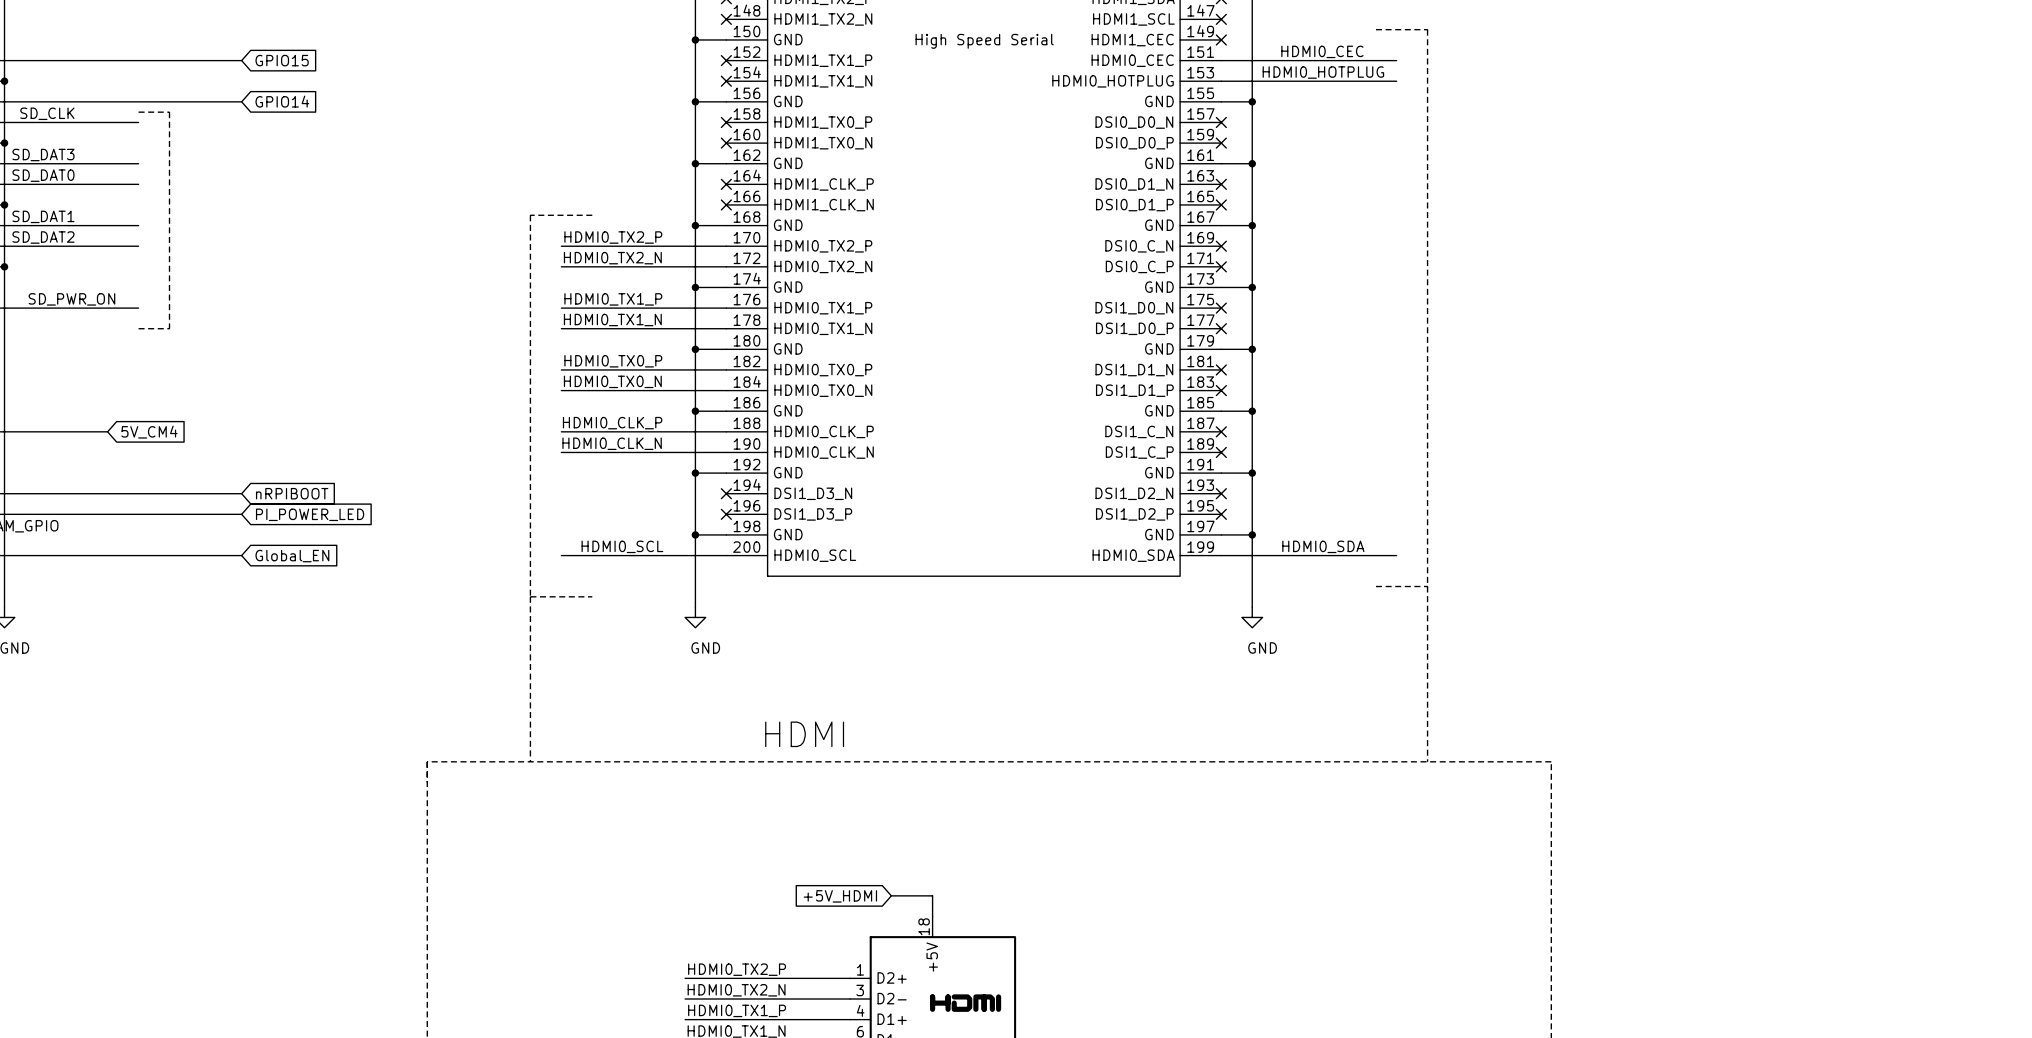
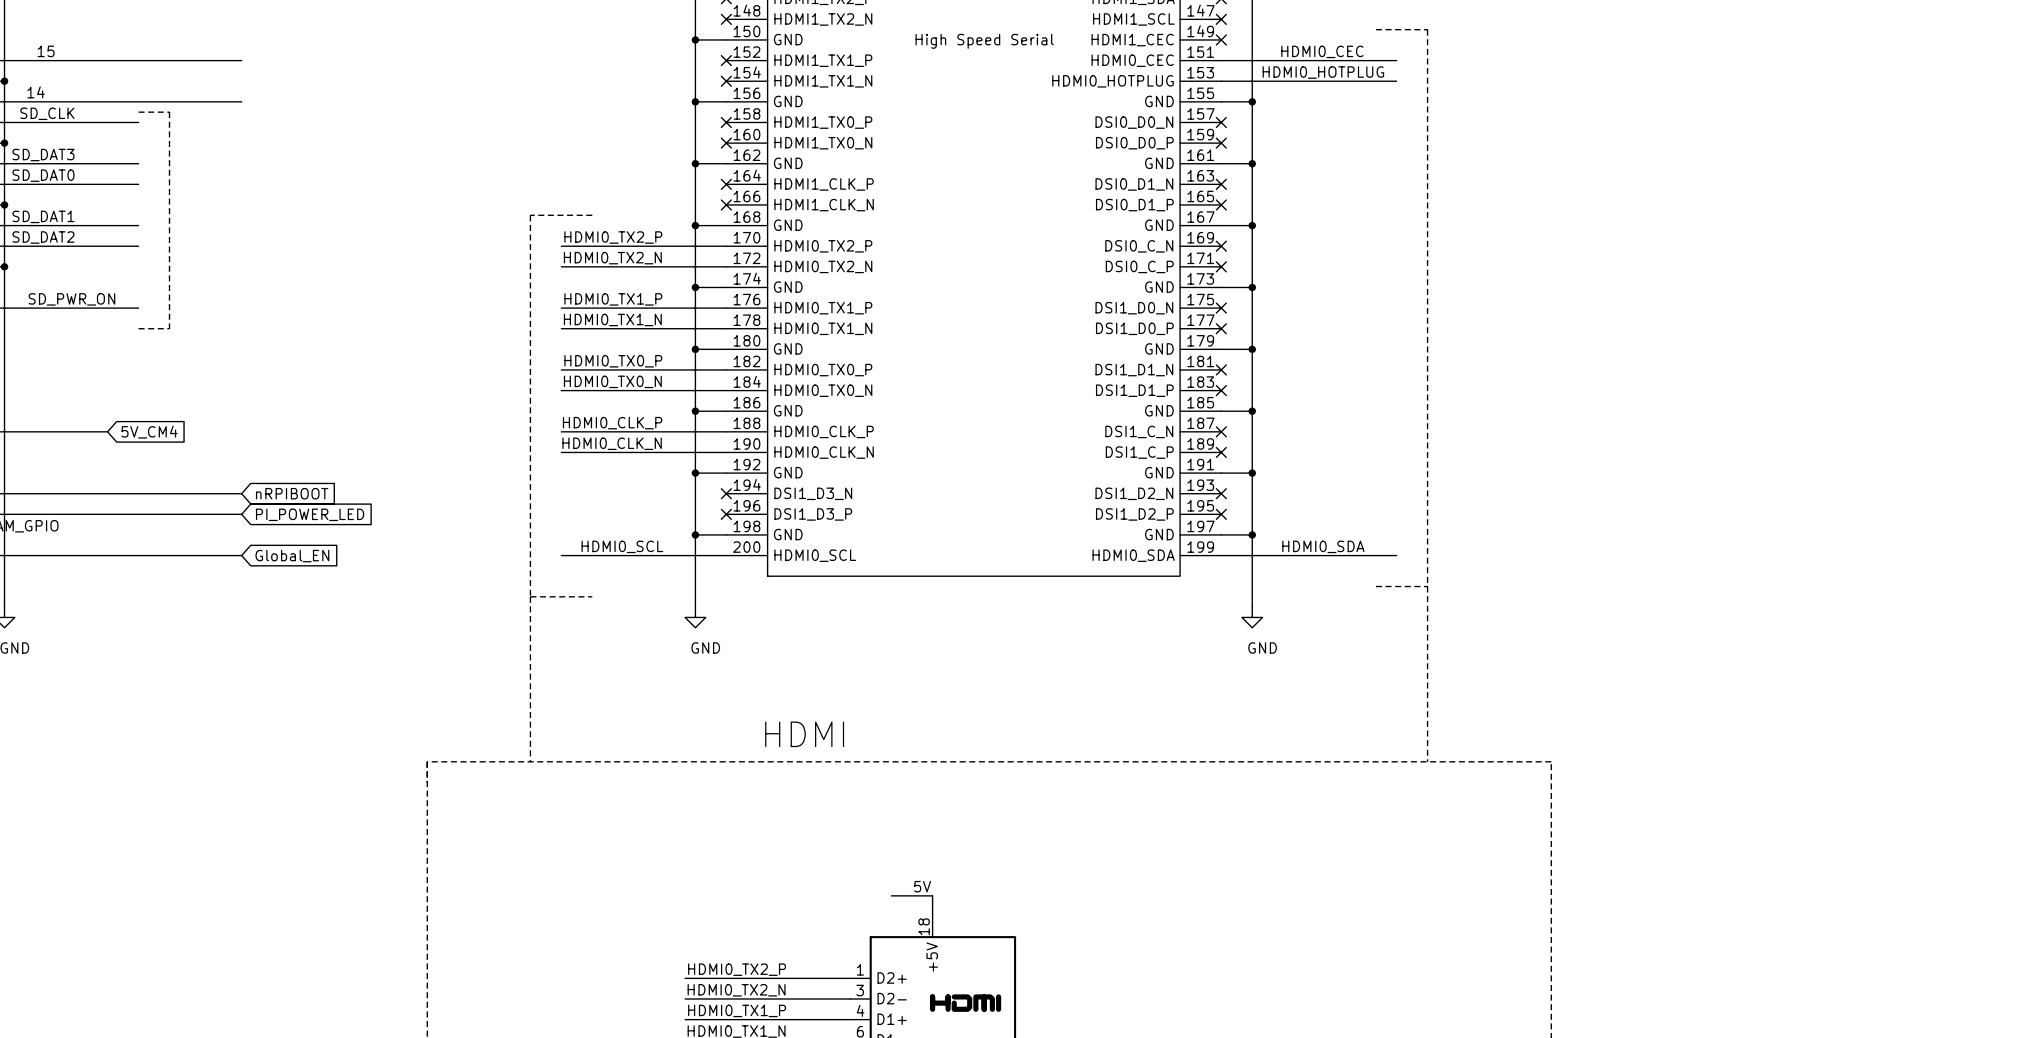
label: none -> 15 (46, 51)
global label: GPIO15 (282, 60) -> none
label: none -> 14 (36, 92)
global label: GPIO14 (282, 101) -> none
label: none -> 5V (922, 886)
global label: +5V_HDMI (840, 896) -> none

